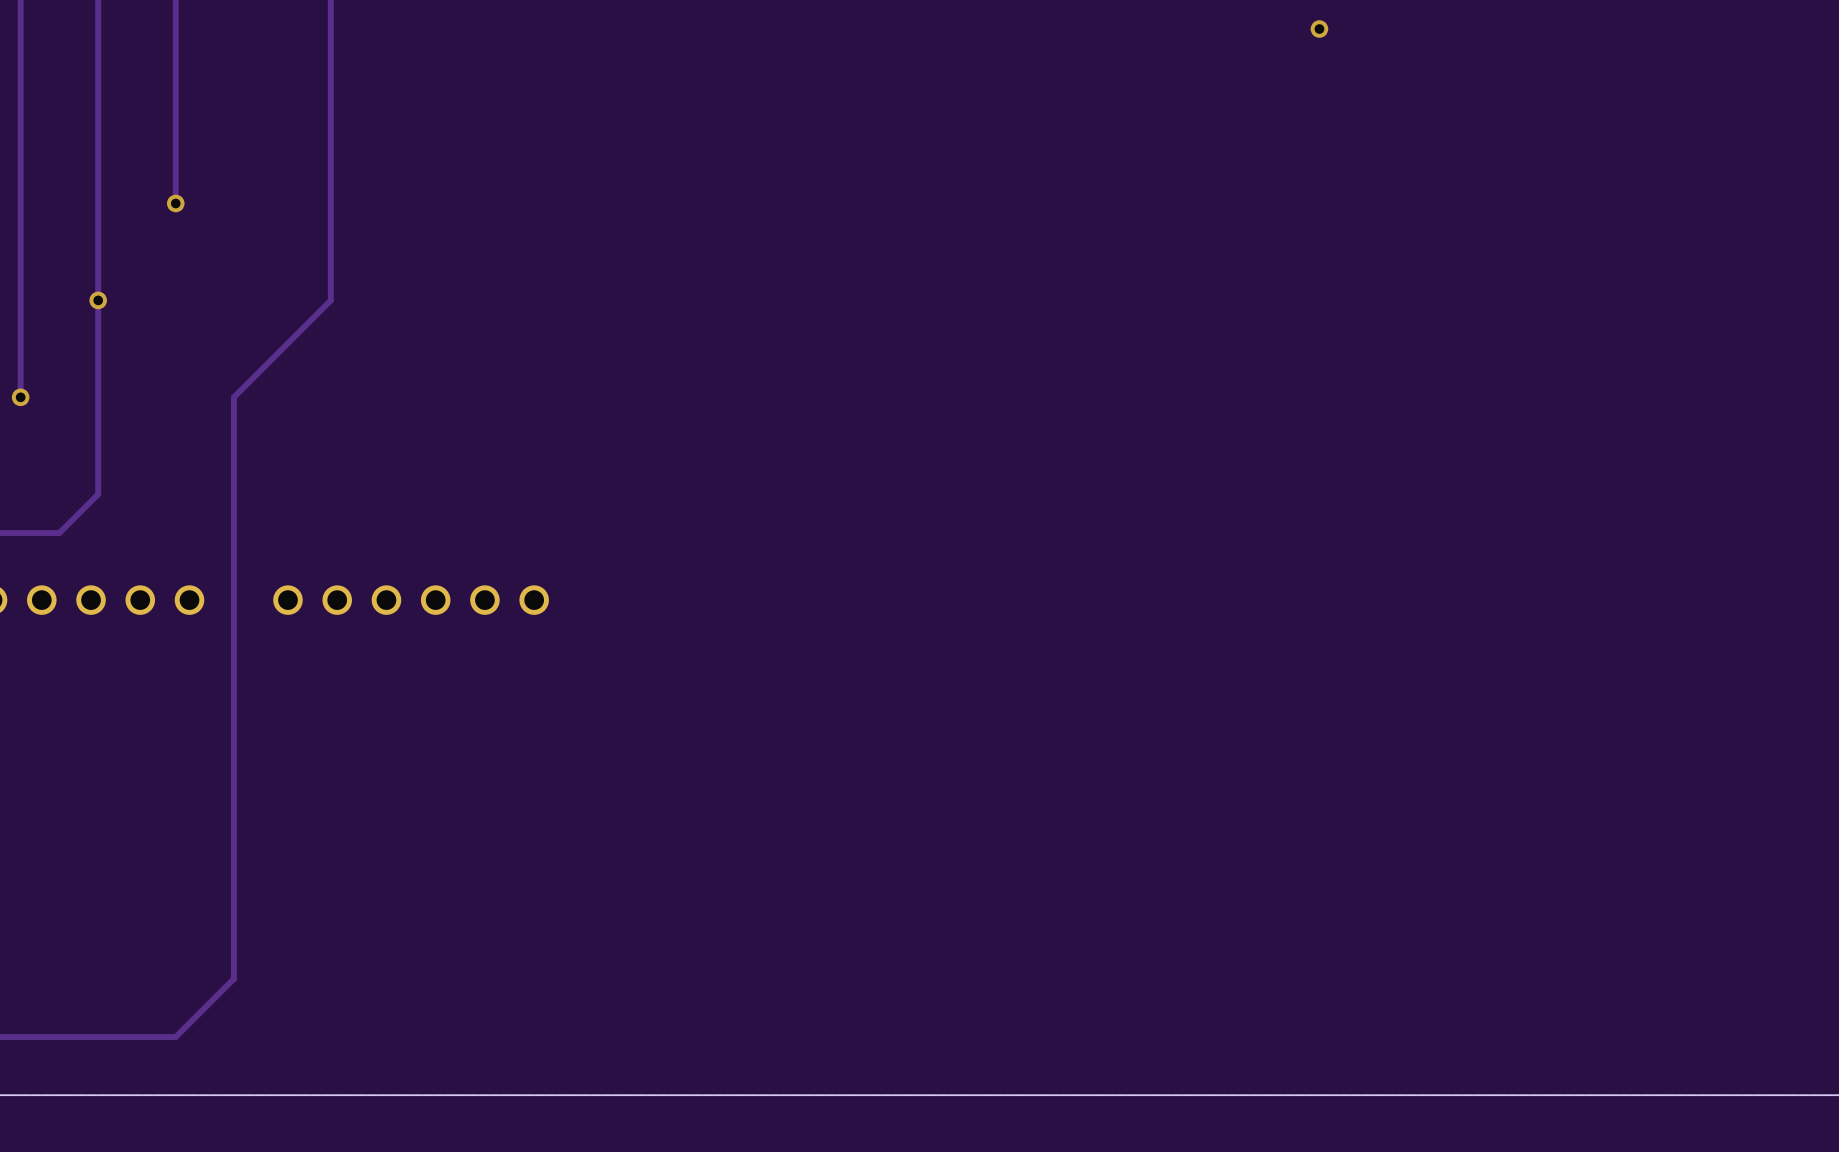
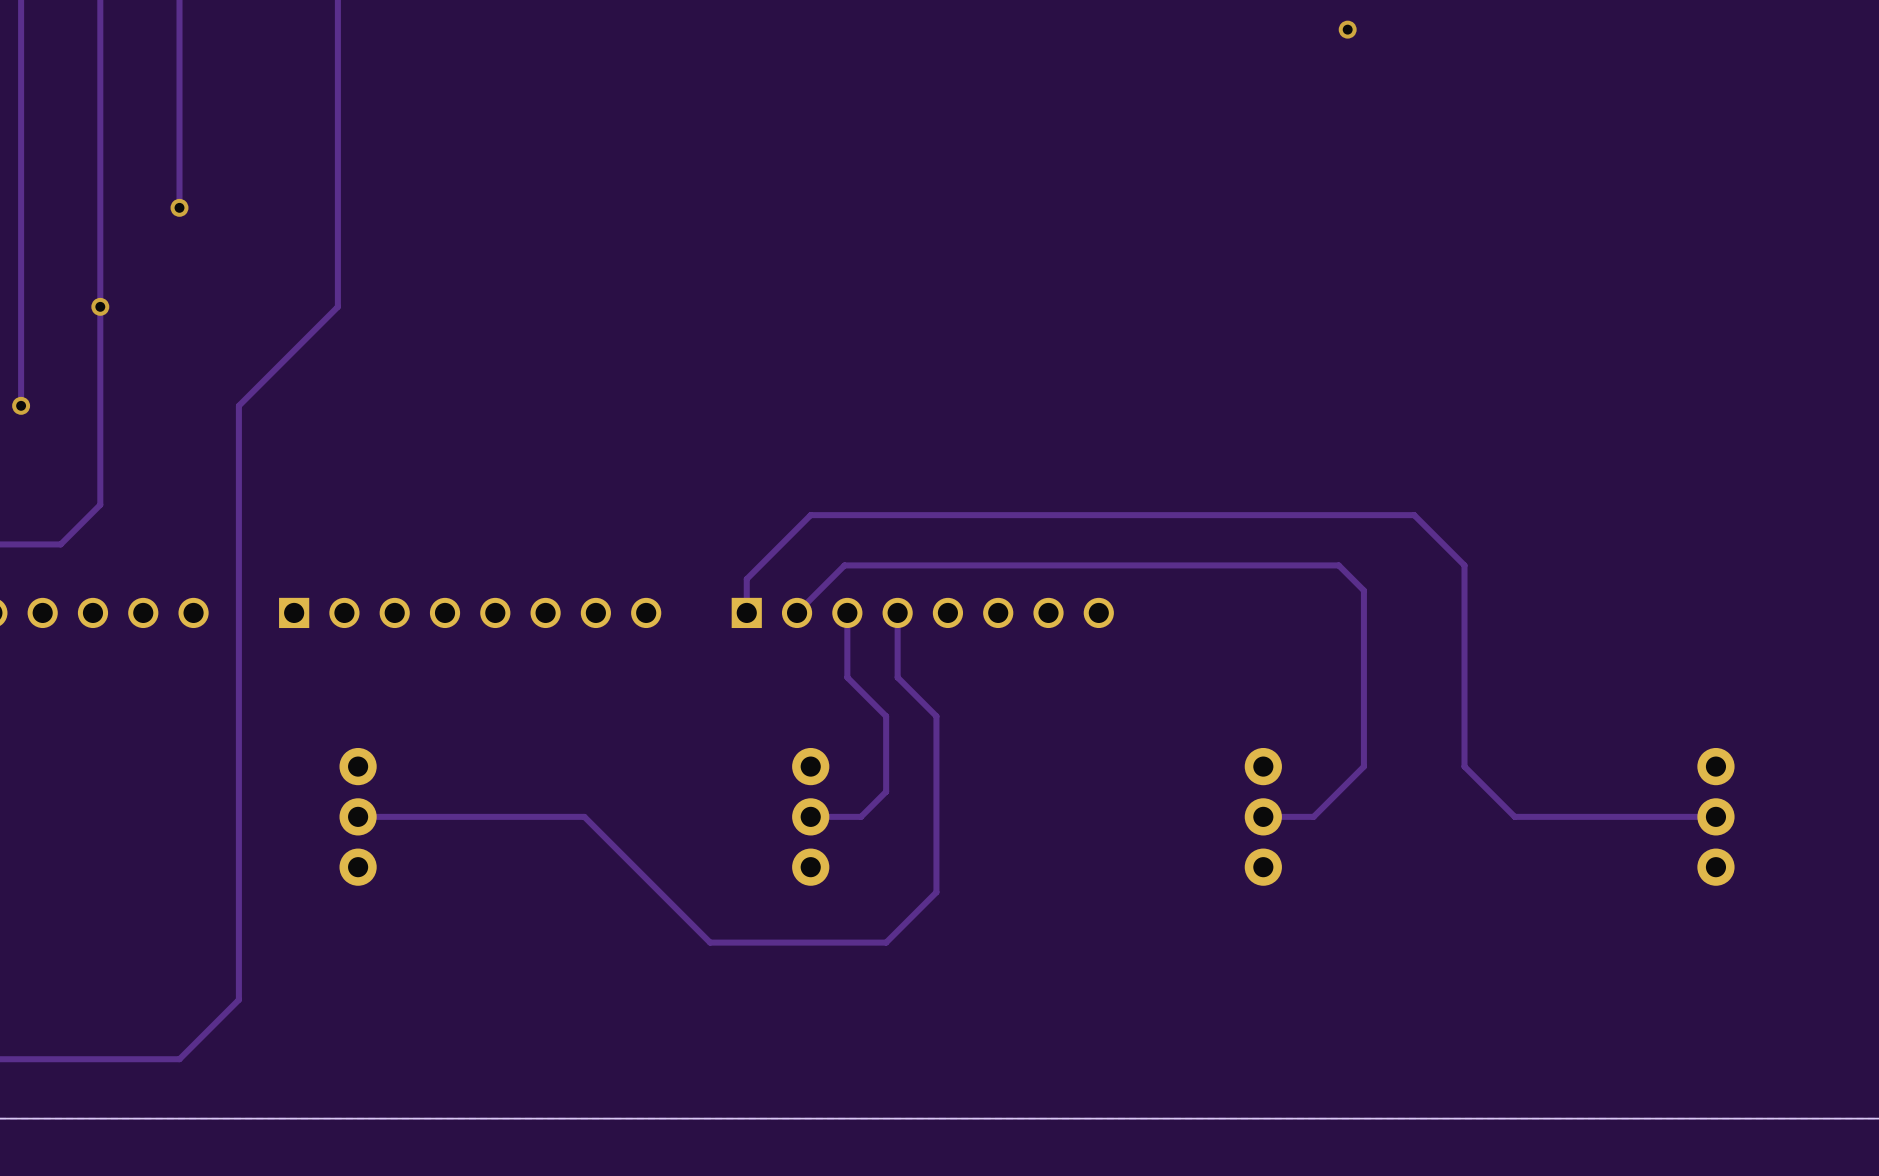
part: (411, 600) -> none
part: none -> (470, 612)
track: none -> (746, 612) (746, 579) (810, 515) (1414, 515) (1464, 565) (1464, 766) (1514, 816) (1715, 816)
track: none -> (797, 612) (844, 565) (1338, 565) (1363, 590) (1363, 766) (1313, 816) (1263, 816)
track: none -> (847, 612) (847, 677) (886, 716) (886, 791) (861, 816) (810, 816)
track: none -> (897, 612) (897, 677) (936, 716) (936, 892) (886, 942) (710, 942) (584, 816) (358, 816)
part: none -> (922, 612)
part: none -> (358, 816)
part: none -> (810, 816)
part: none -> (1263, 816)
part: none -> (1715, 816)

